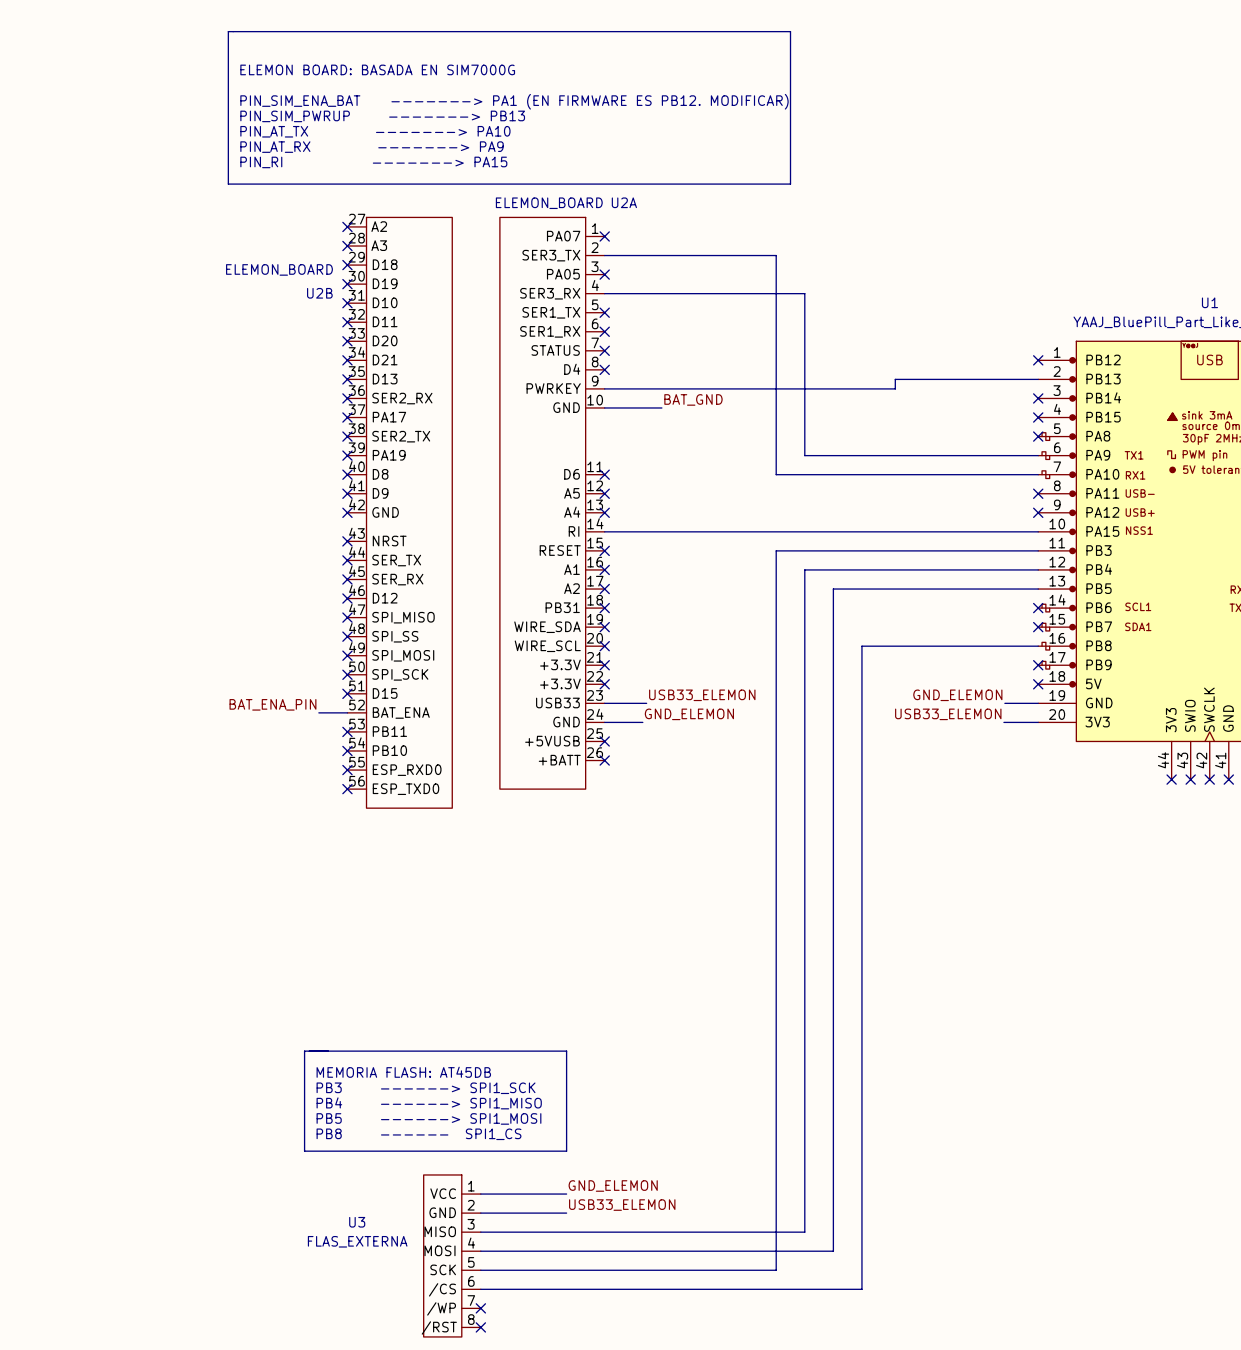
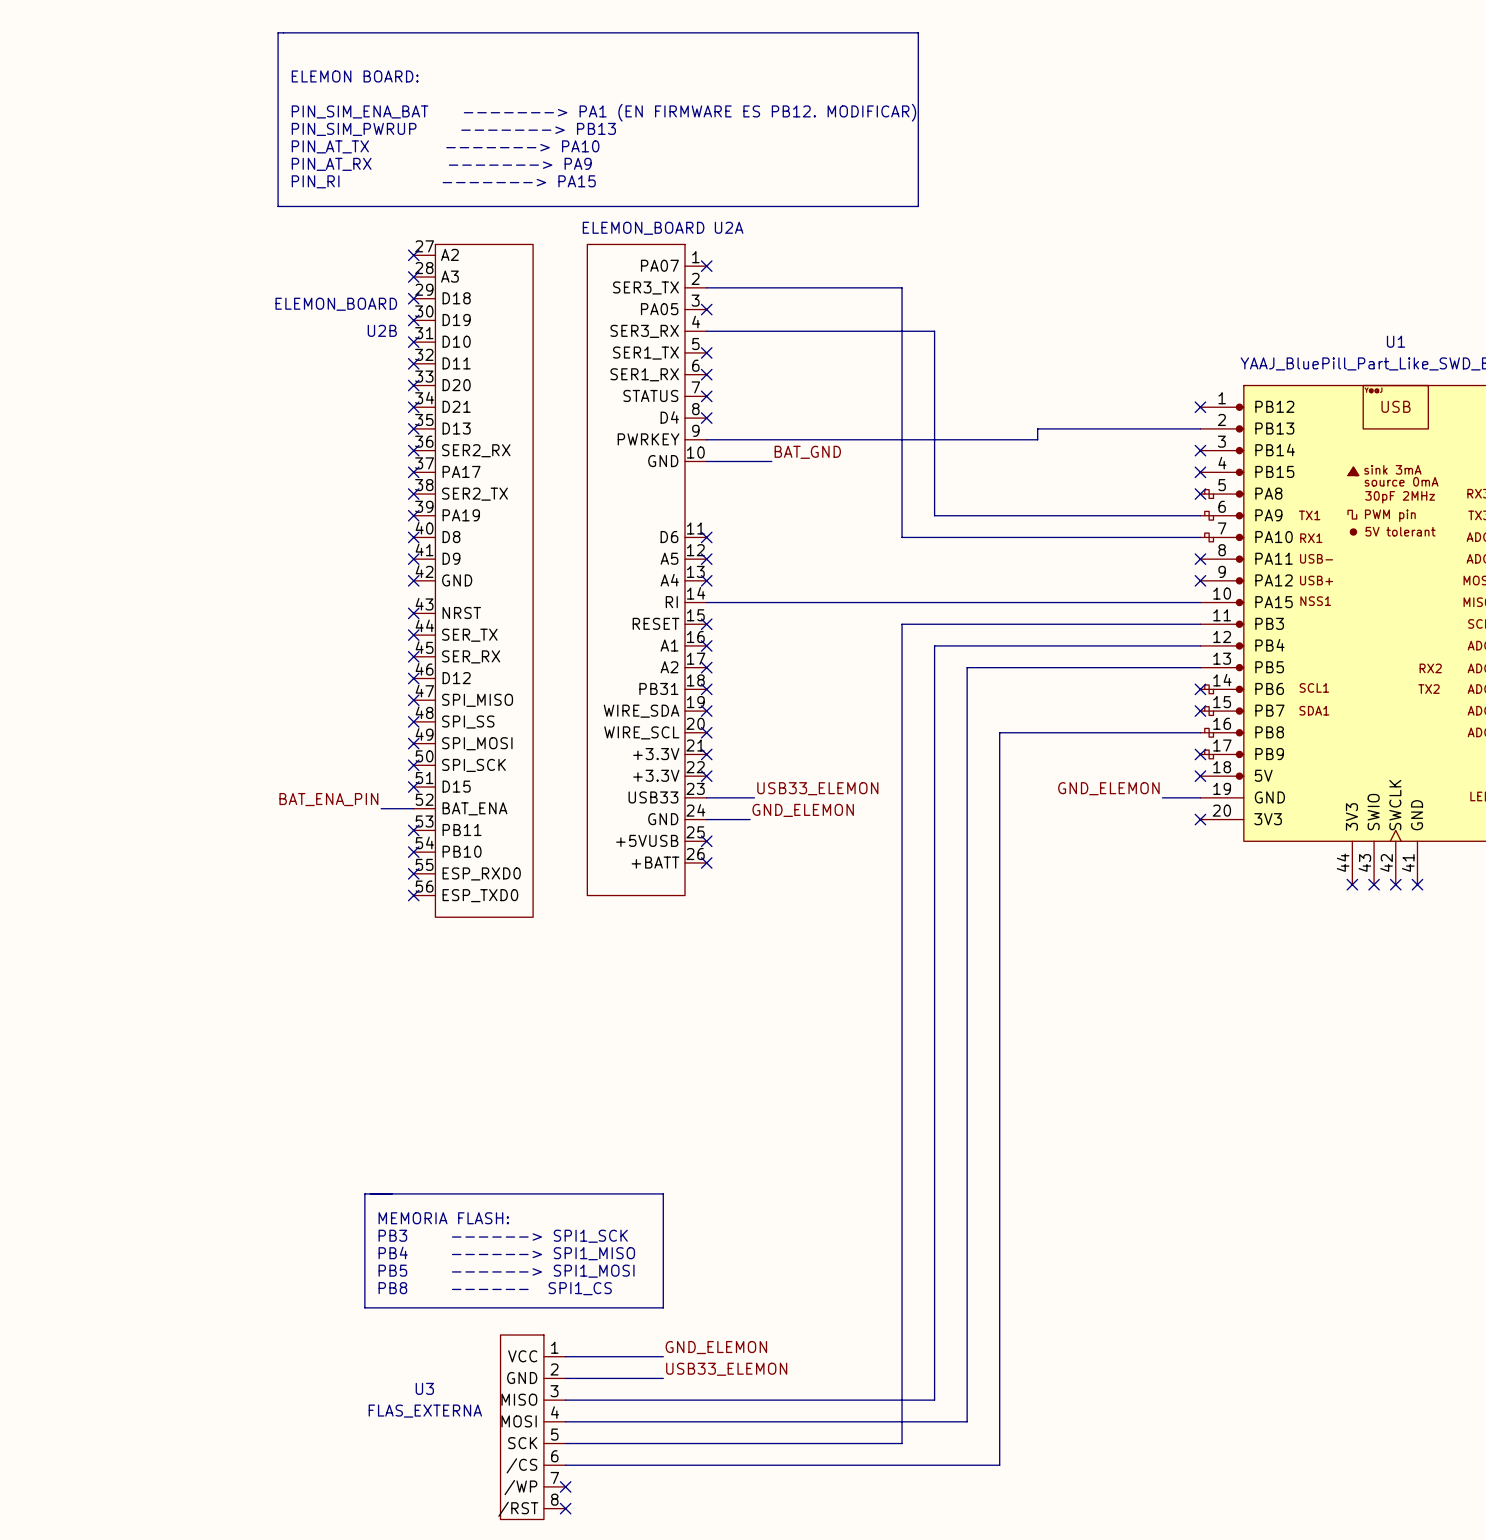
text: ELEMON BOARD: BASADA EN SIM7000G (377, 69) -> ELEMON BOARD: (355, 76)
label: USB33_ELEMON (948, 714) -> none
wire: (1003, 722) (1038, 722) -> none
no-connect mark: none -> (1200, 819)
text: MEMORIA FLASH: AT45DB (403, 1072) -> MEMORIA FLASH: (443, 1218)

